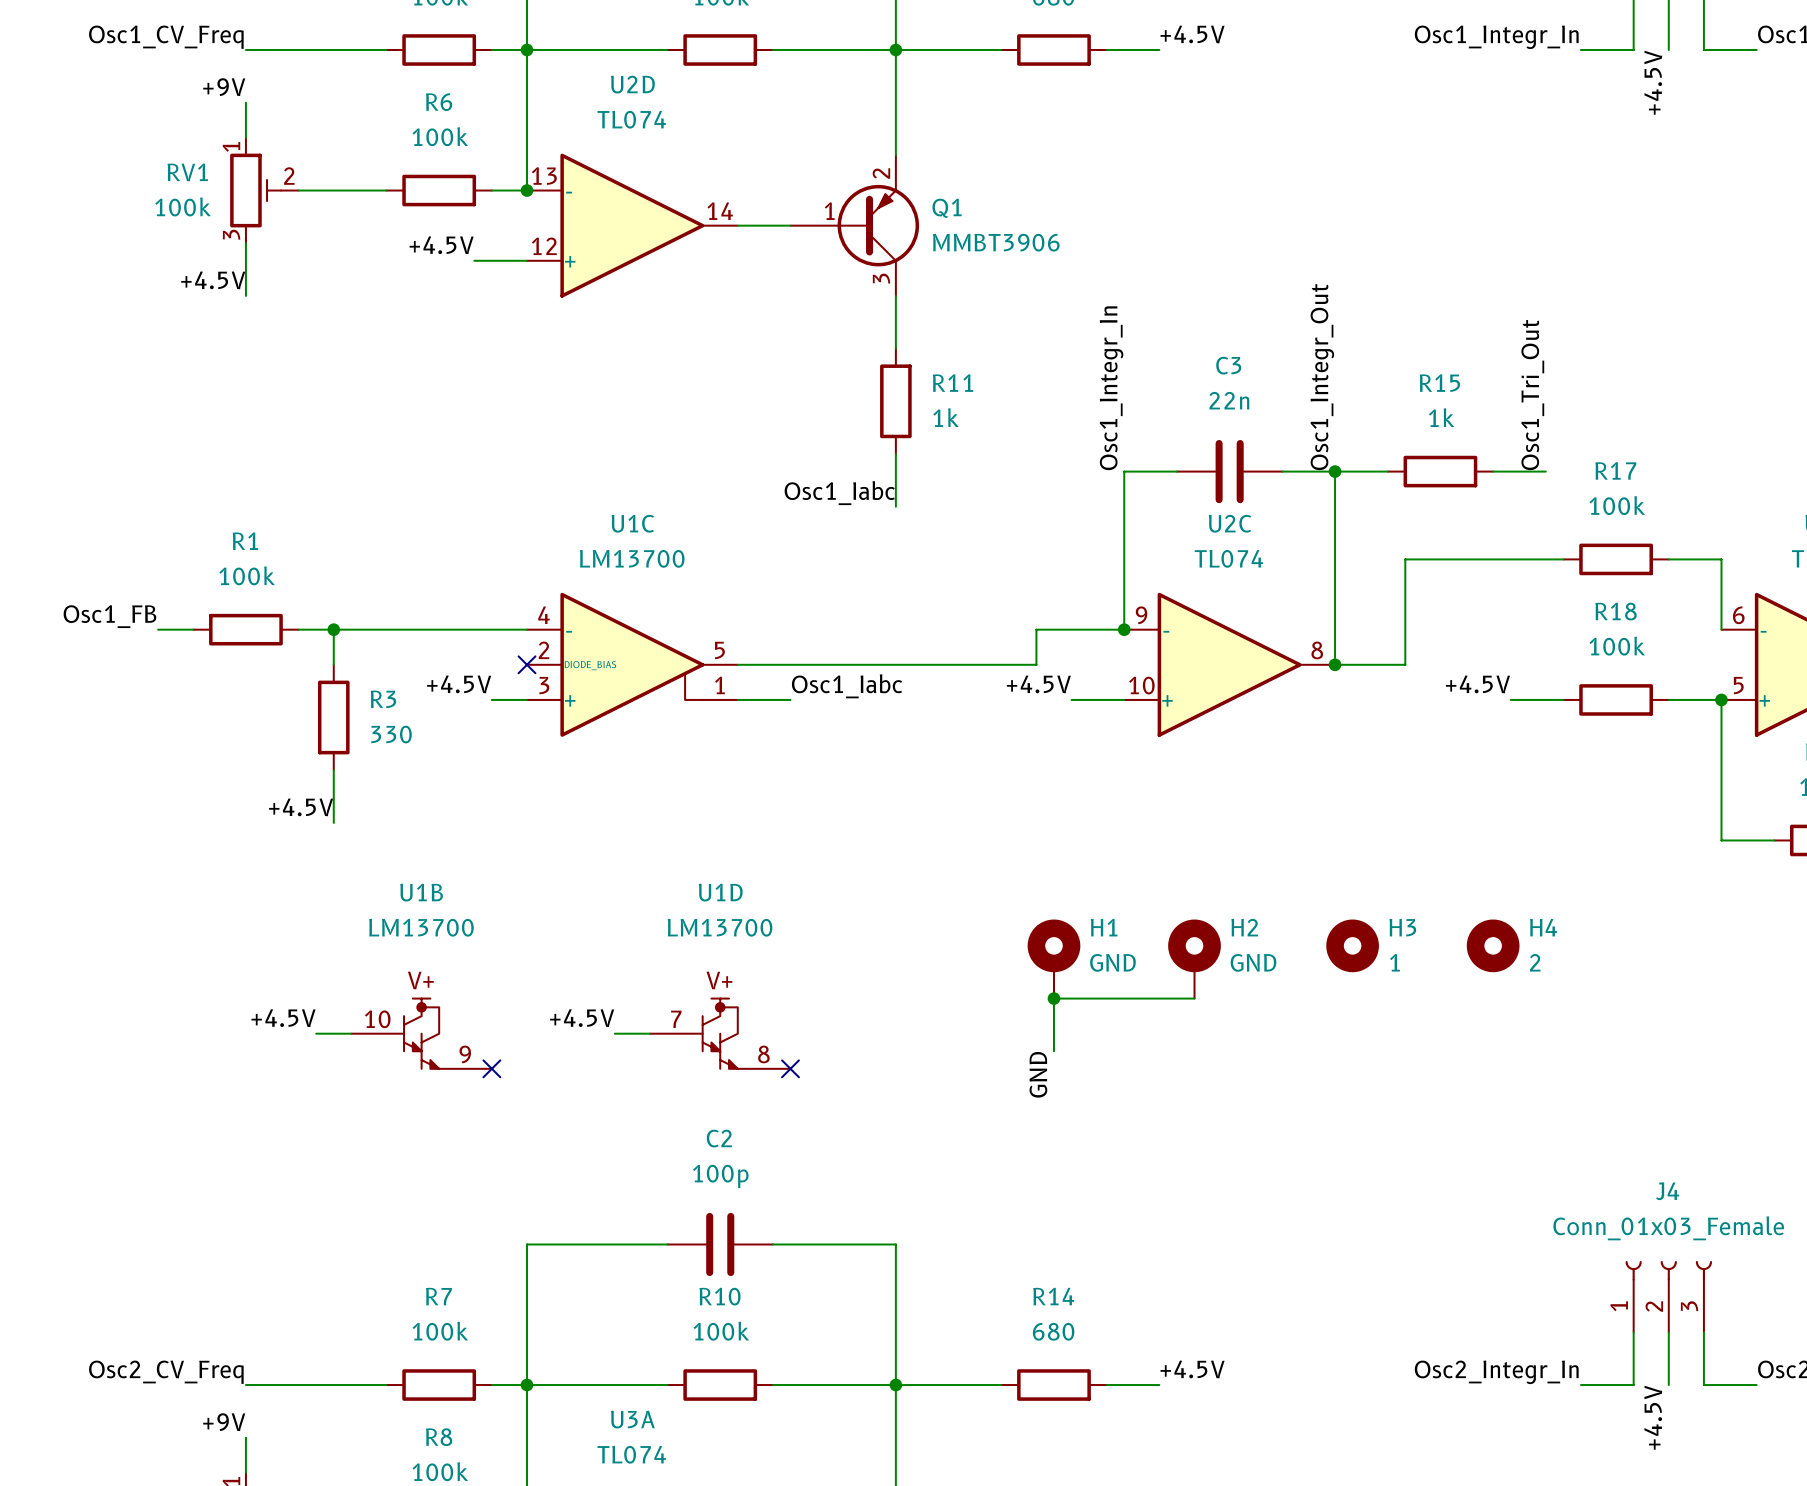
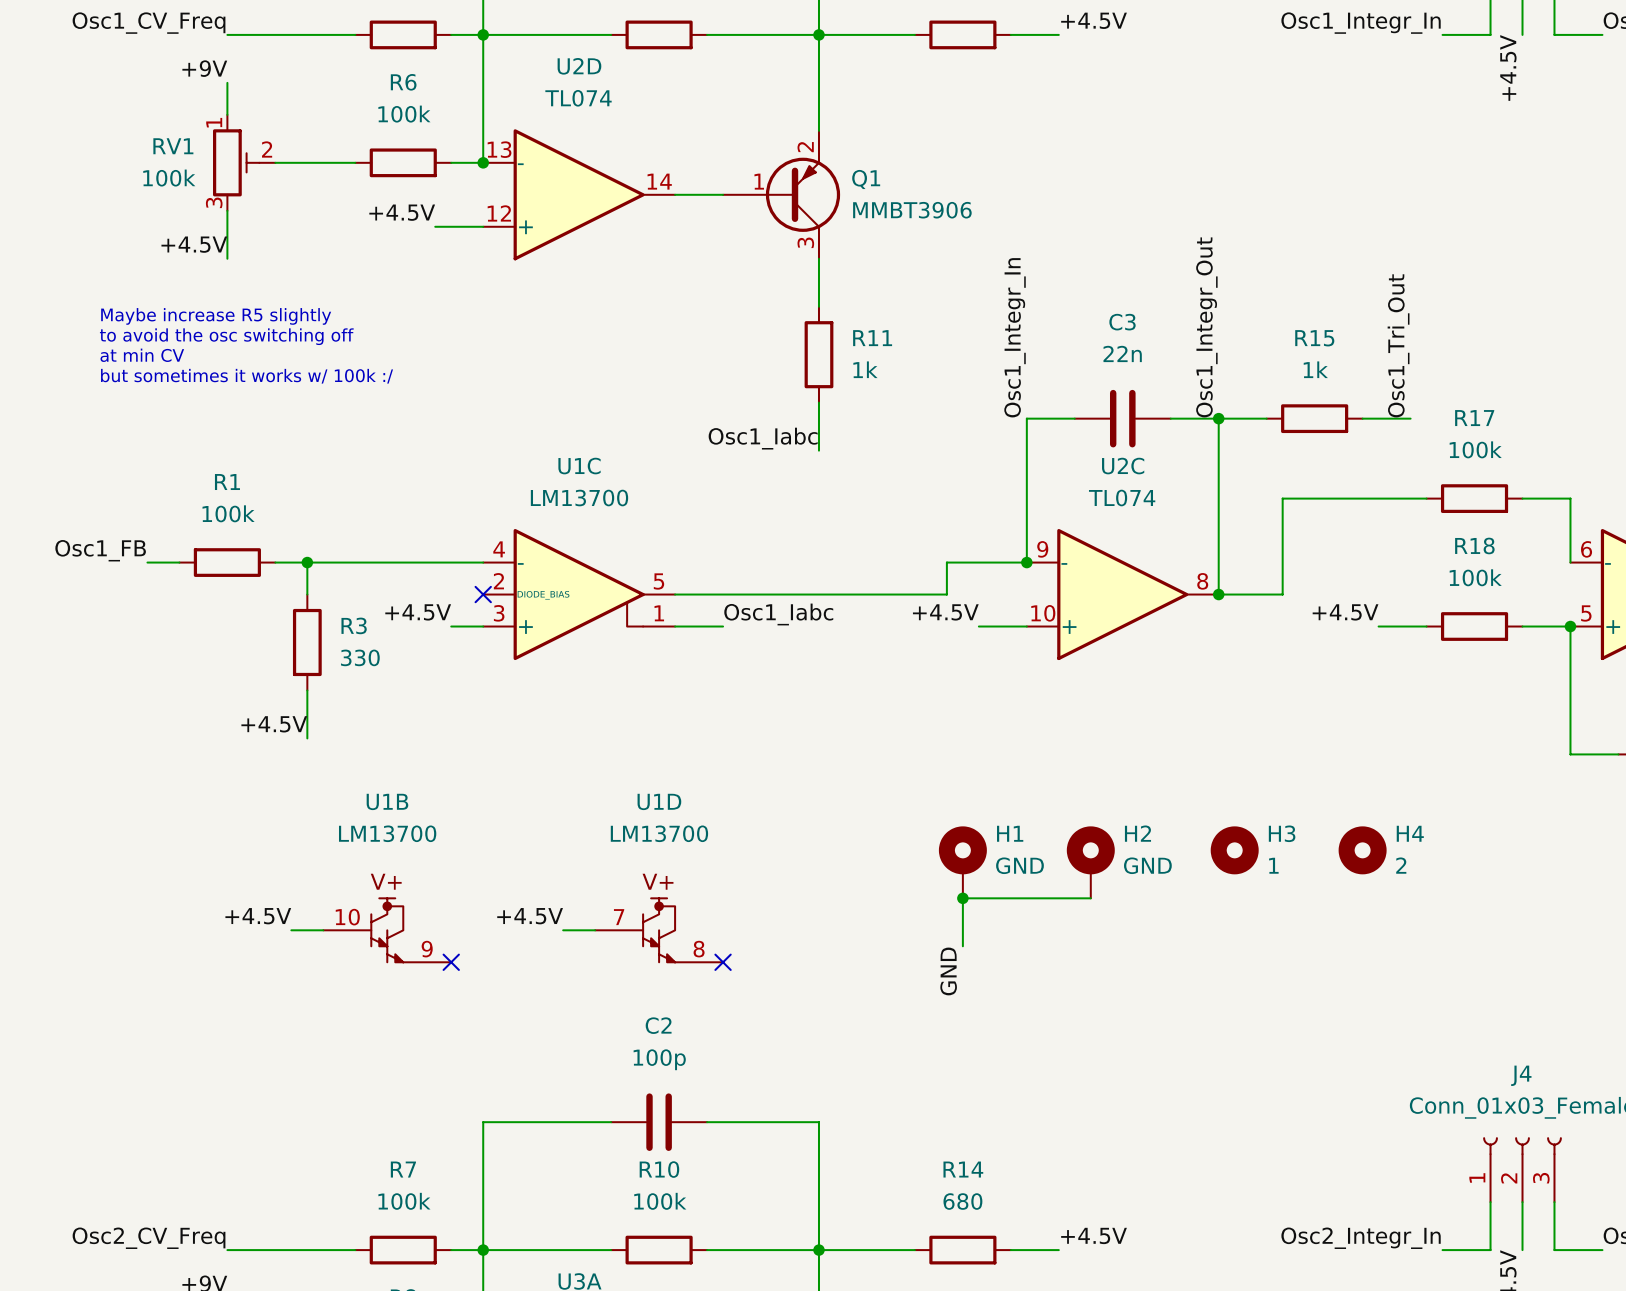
text: none -> Maybe increase R5 slightly (216, 316)
text: none -> to avoid the osc switching off (226, 336)
text: none -> at min CV (142, 355)
text: none -> but sometimes it works w/ 100k :/ (247, 376)

